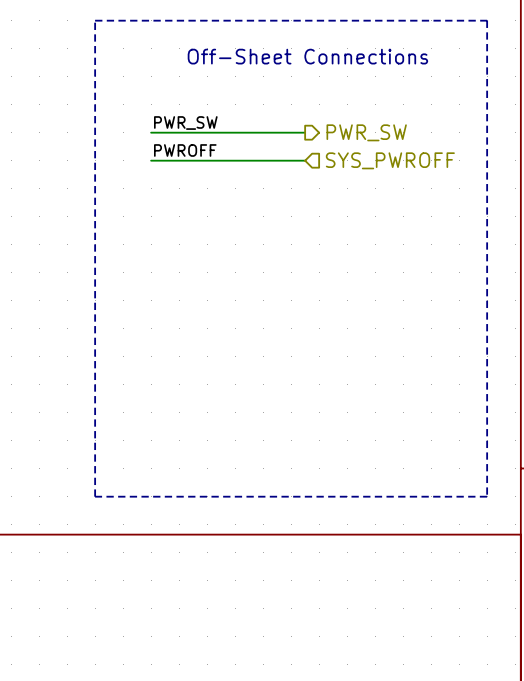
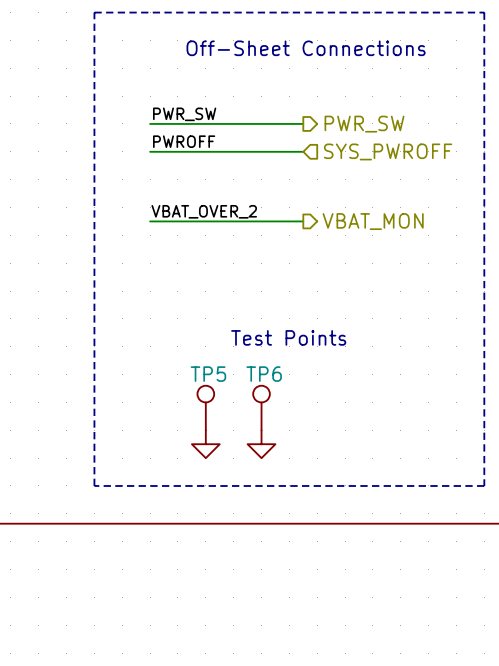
label: none -> VBAT_OVER_2 (204, 211)
wire: none -> (150, 221) (303, 221)
hierarchical label: none -> VBAT_MON (373, 221)
text: none -> Test Points (288, 337)
TP5: none -> (205, 408)
TP6: none -> (261, 408)
power symbol: none -> (205, 444)
power symbol: none -> (261, 444)

